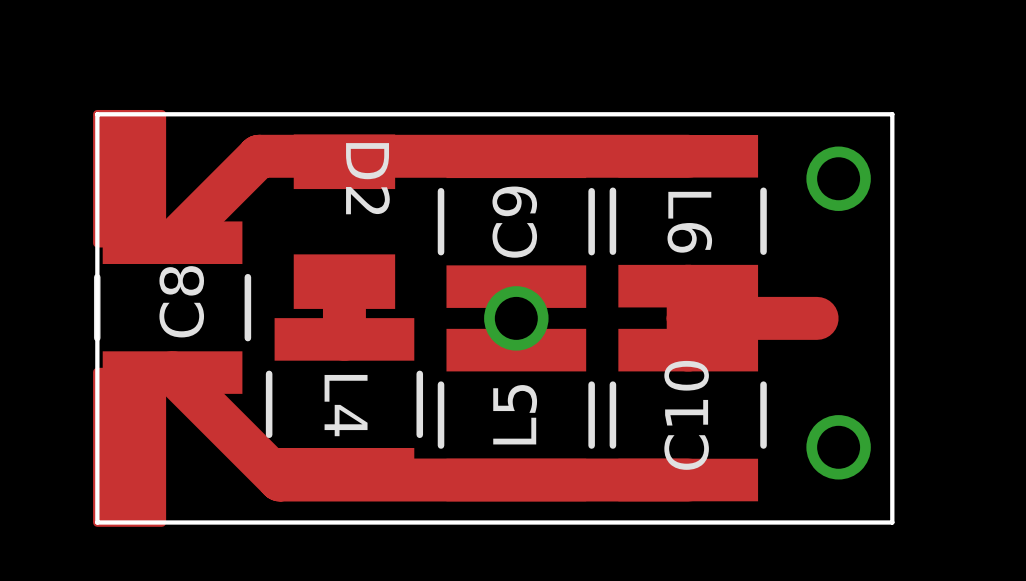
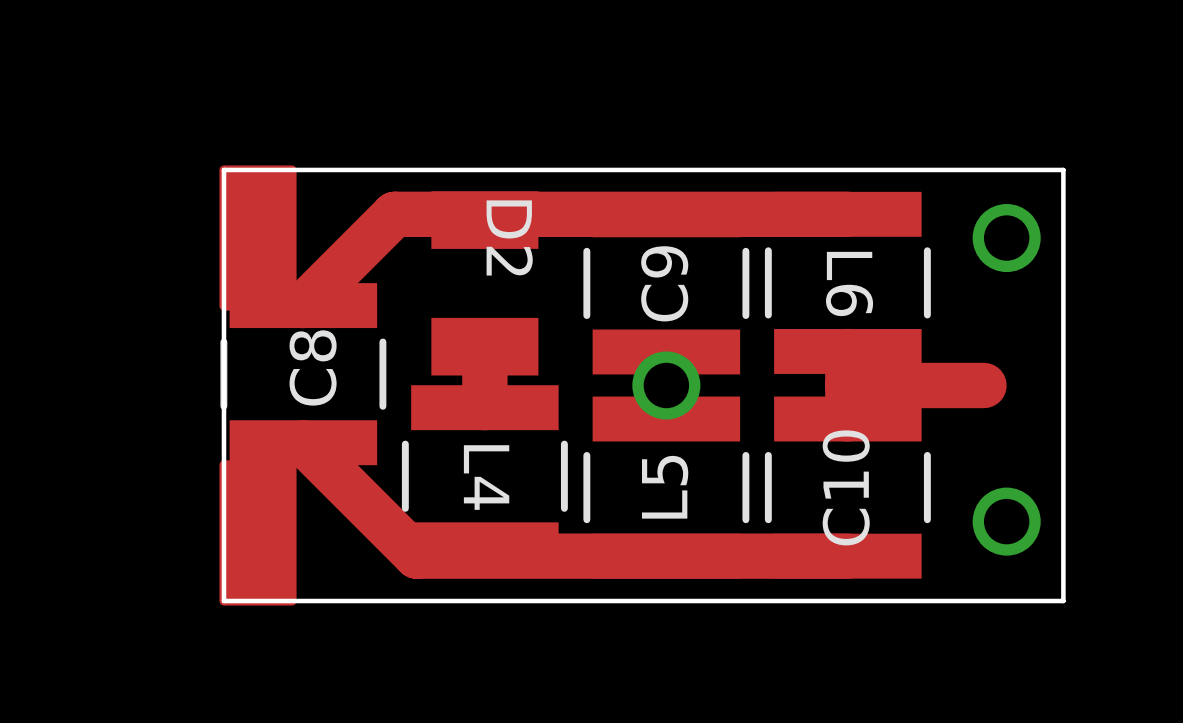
drawing shape: [93, 367, 167, 527] -> [219, 460, 297, 606]

